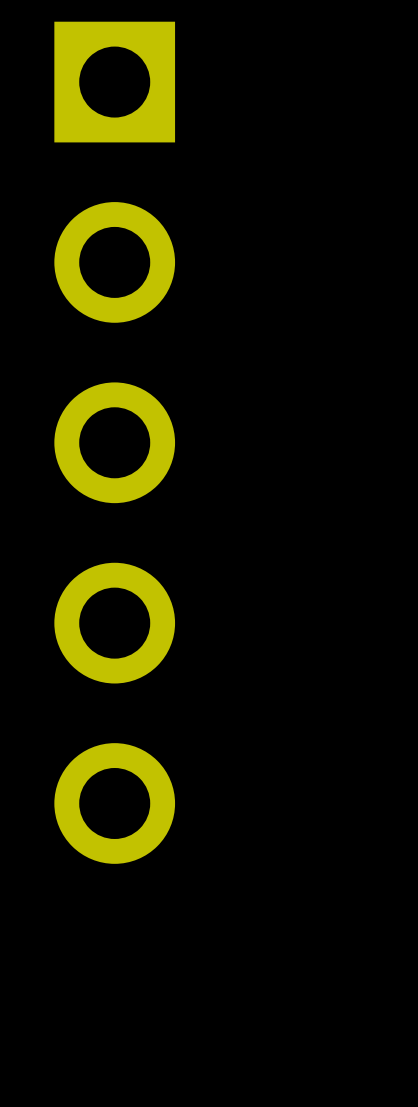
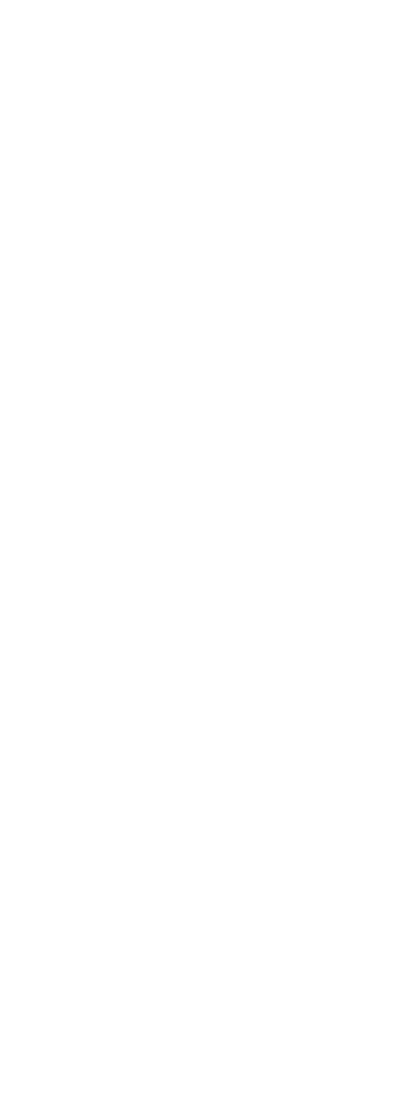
part: (114, 442) -> none

